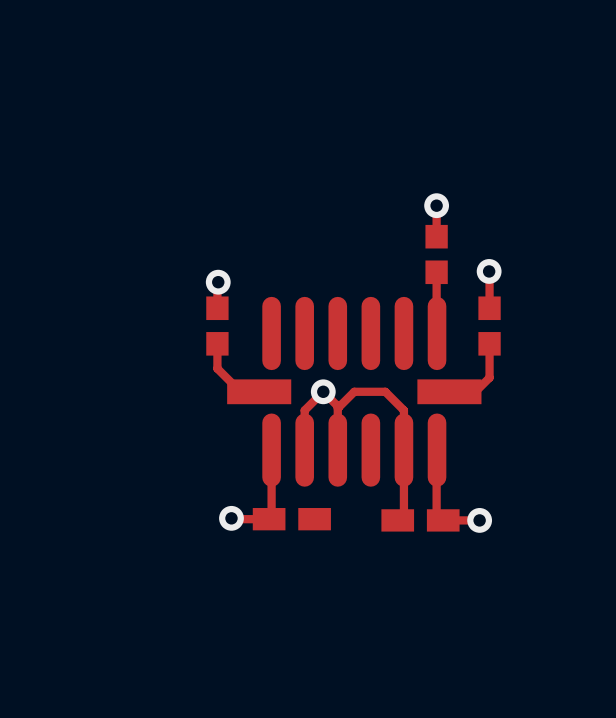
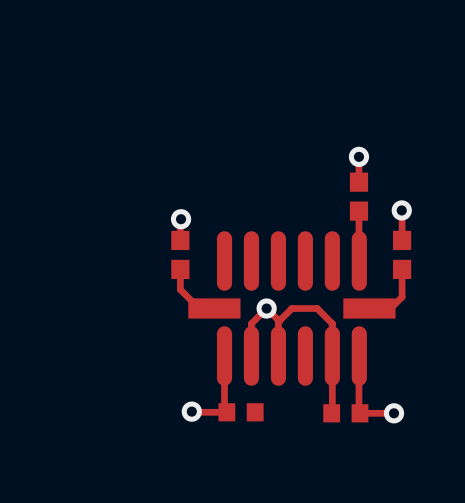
part footprint: [252, 508, 331, 531] -> [218, 403, 264, 422]
part footprint: [381, 509, 460, 532] -> [323, 404, 369, 423]

